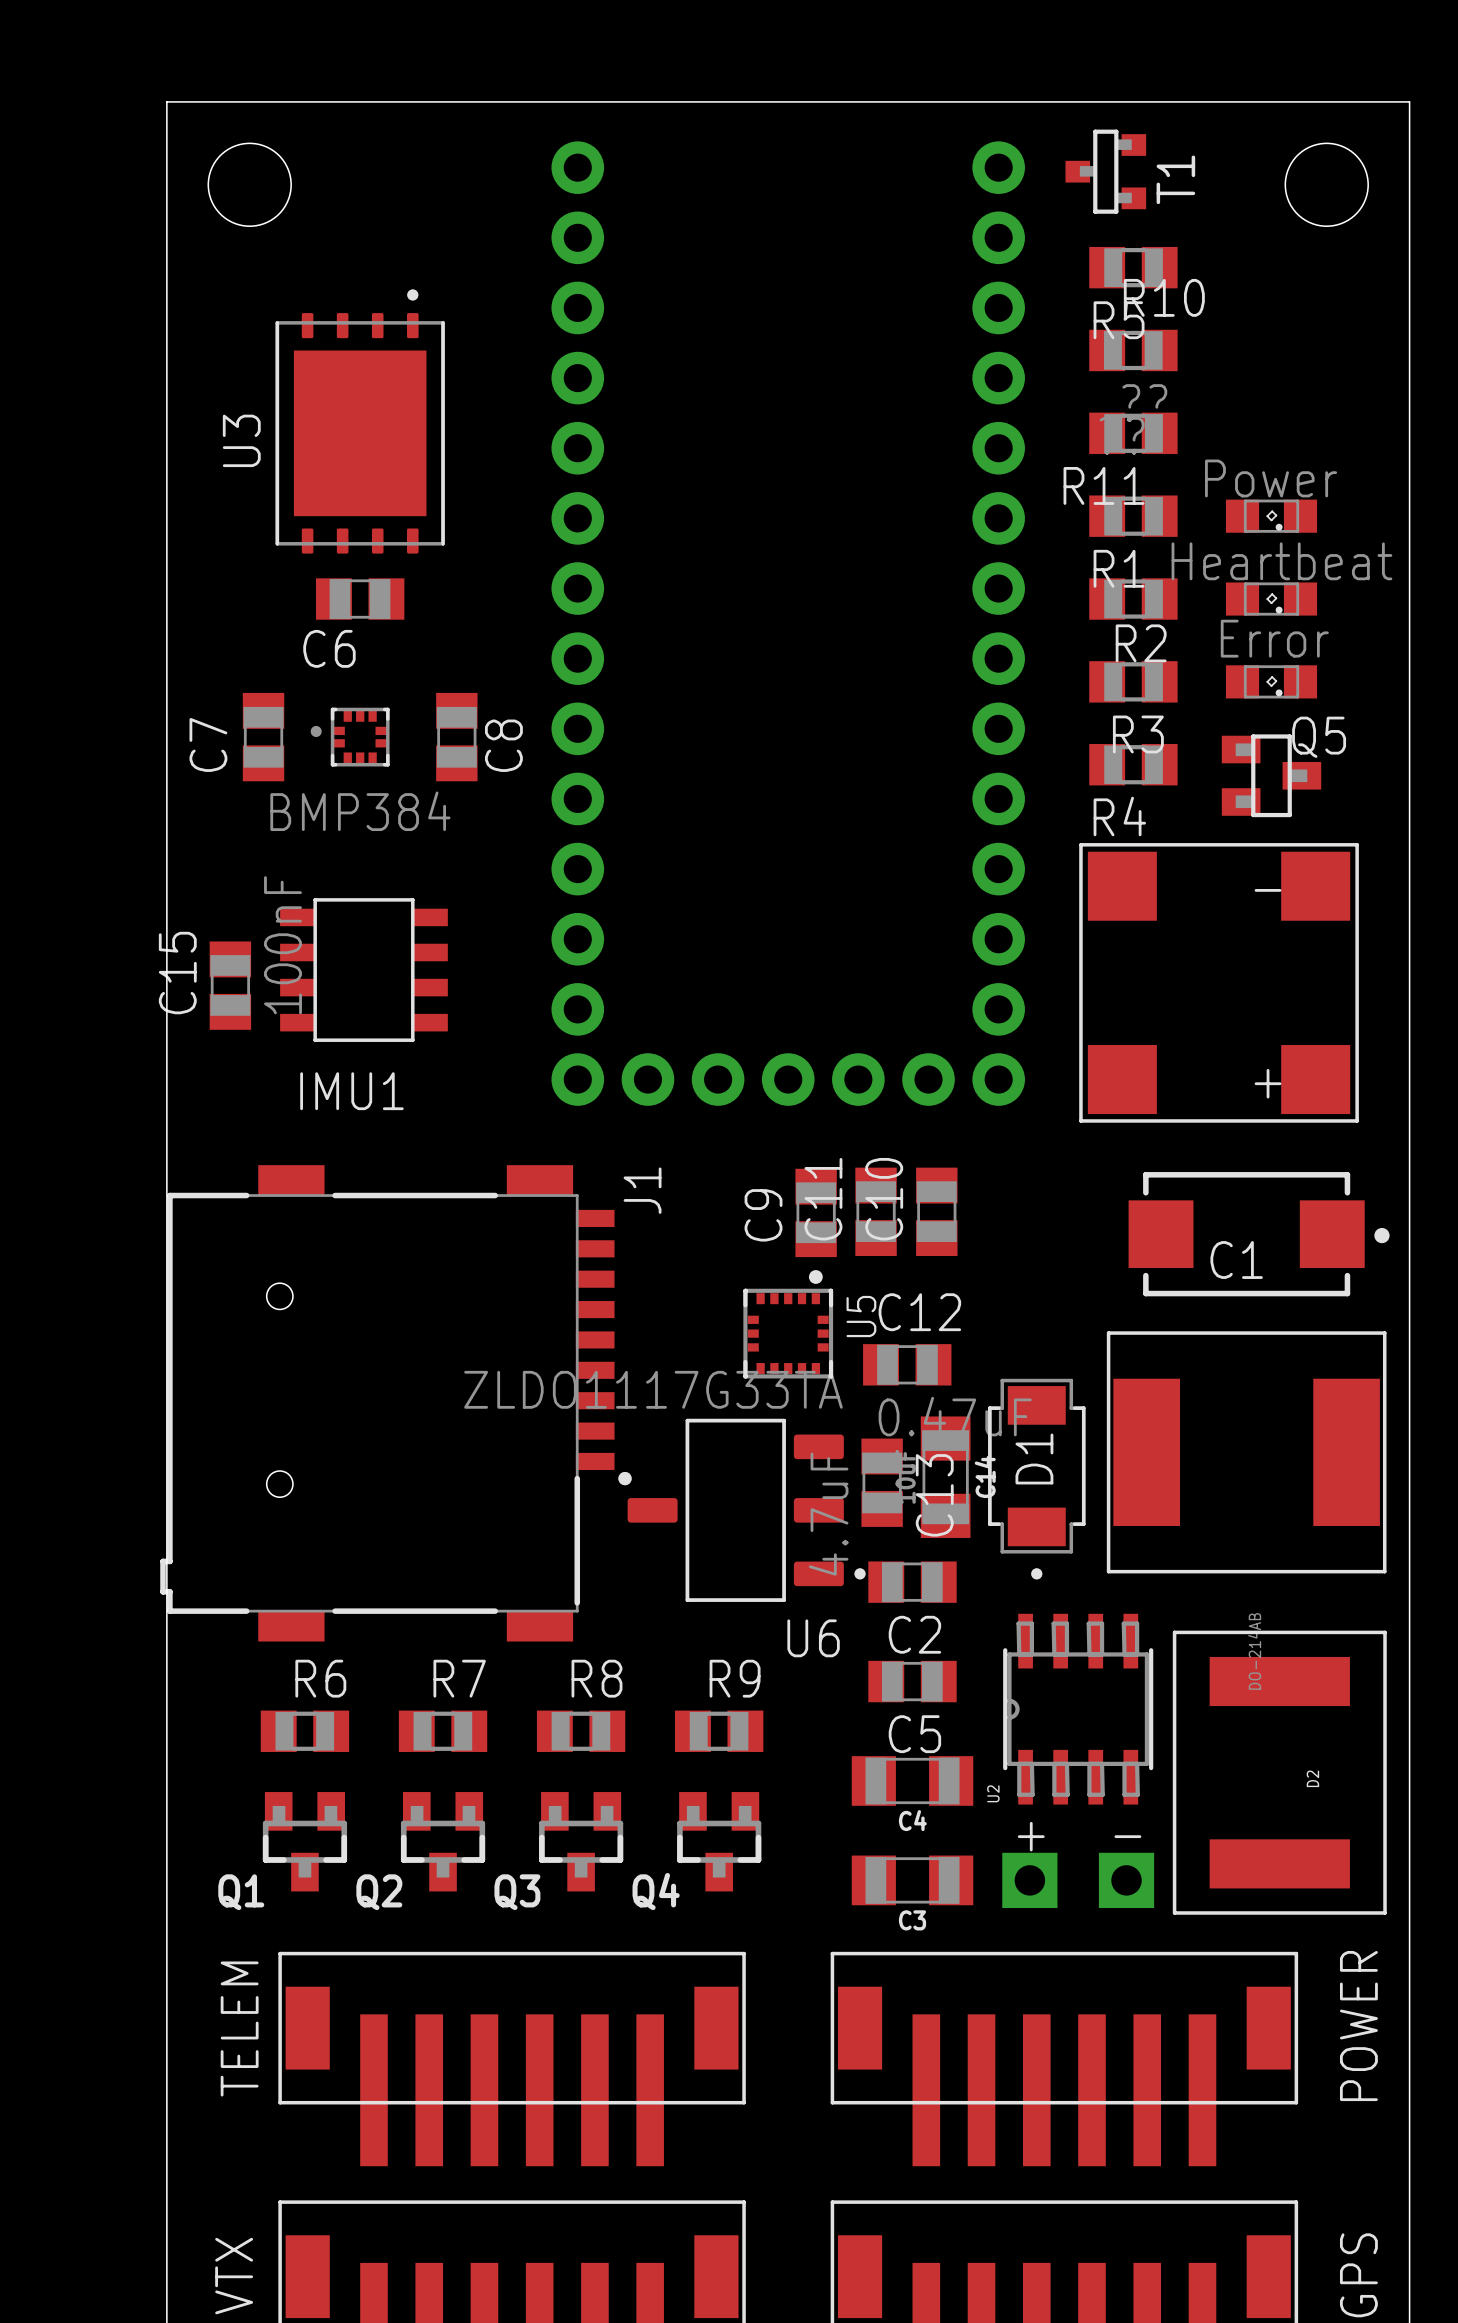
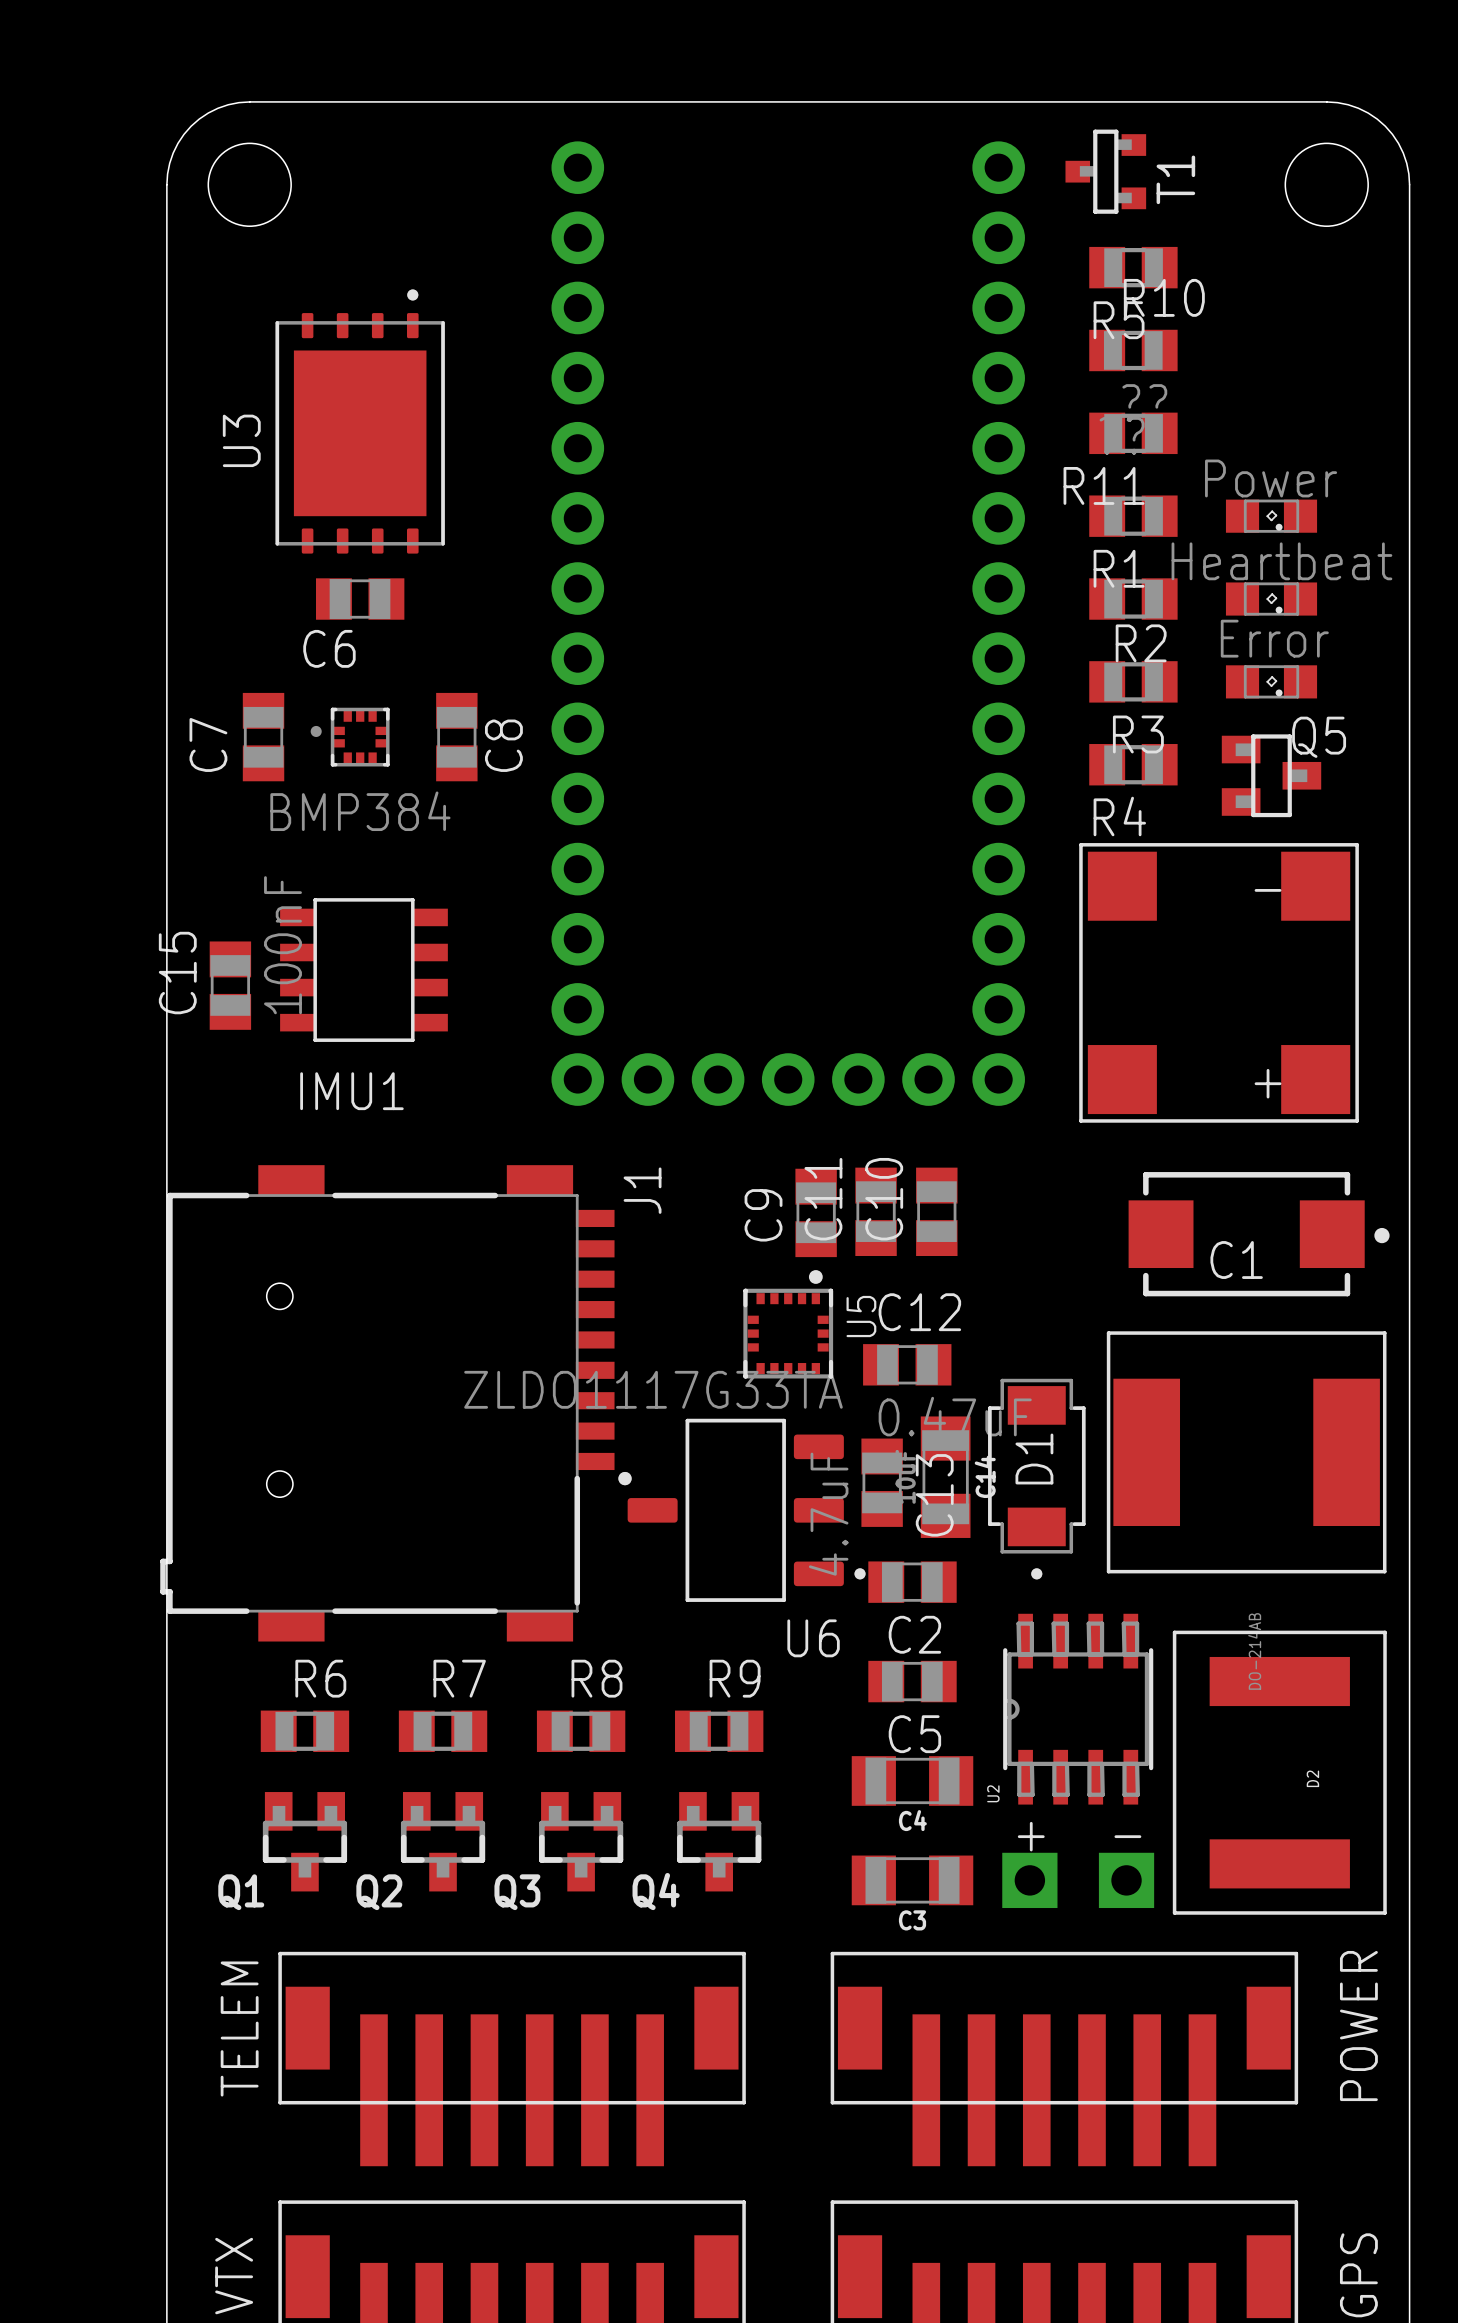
board edge: (249, 101) (166, 101) (166, 184) -> (249, 101) (218, 108) (191, 126) (173, 153) (166, 184)
board edge: (1326, 101) (1409, 101) (1409, 184) -> (1326, 101) (1358, 108) (1385, 126) (1403, 153) (1409, 184)

